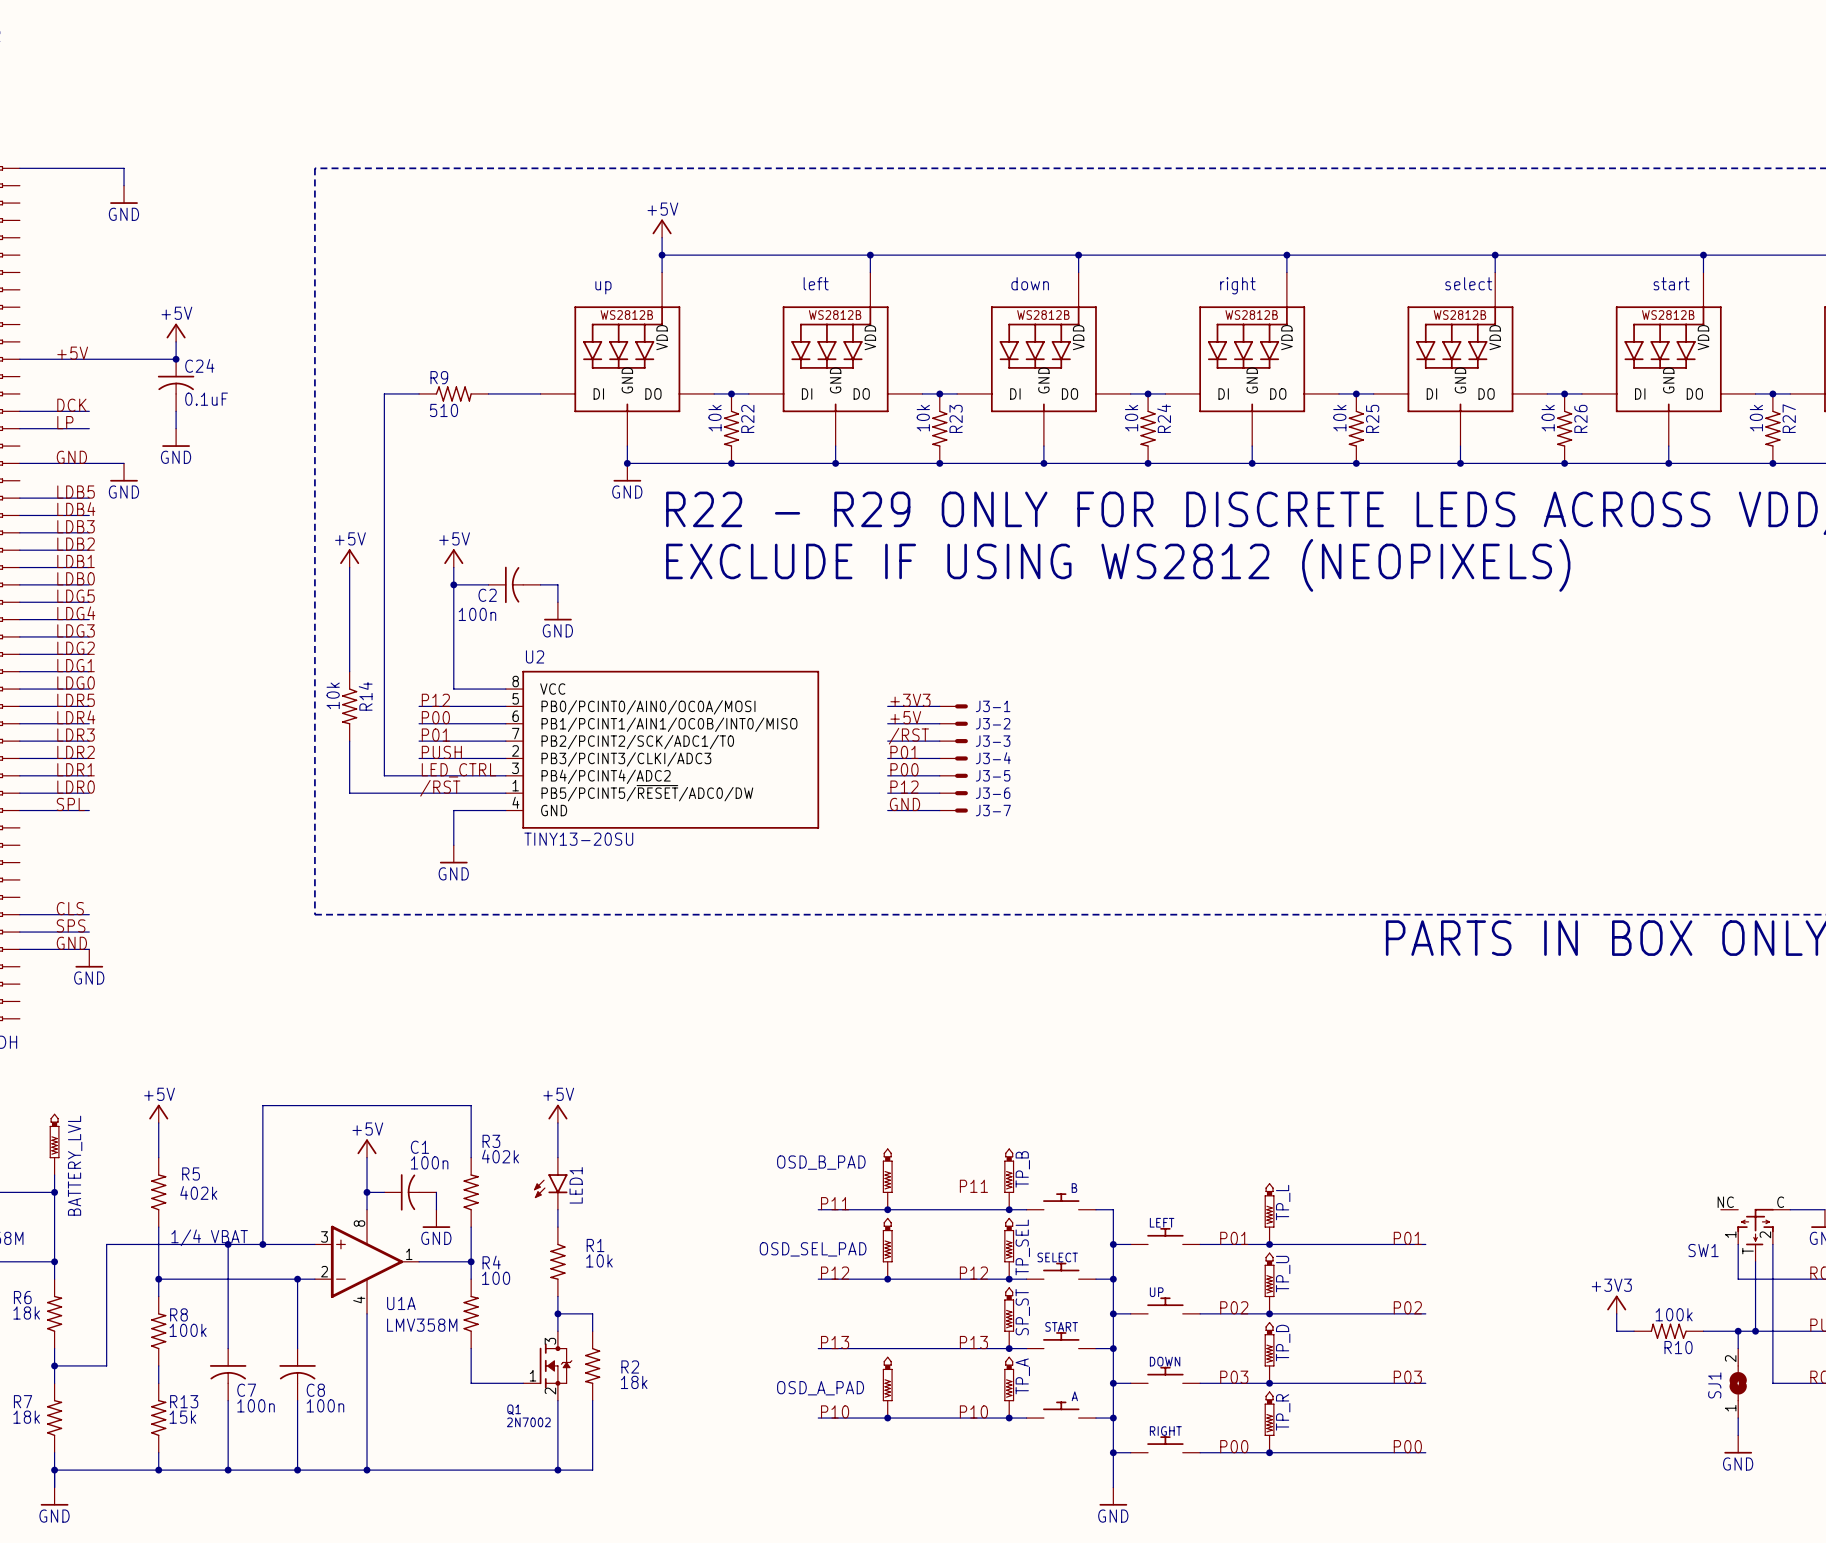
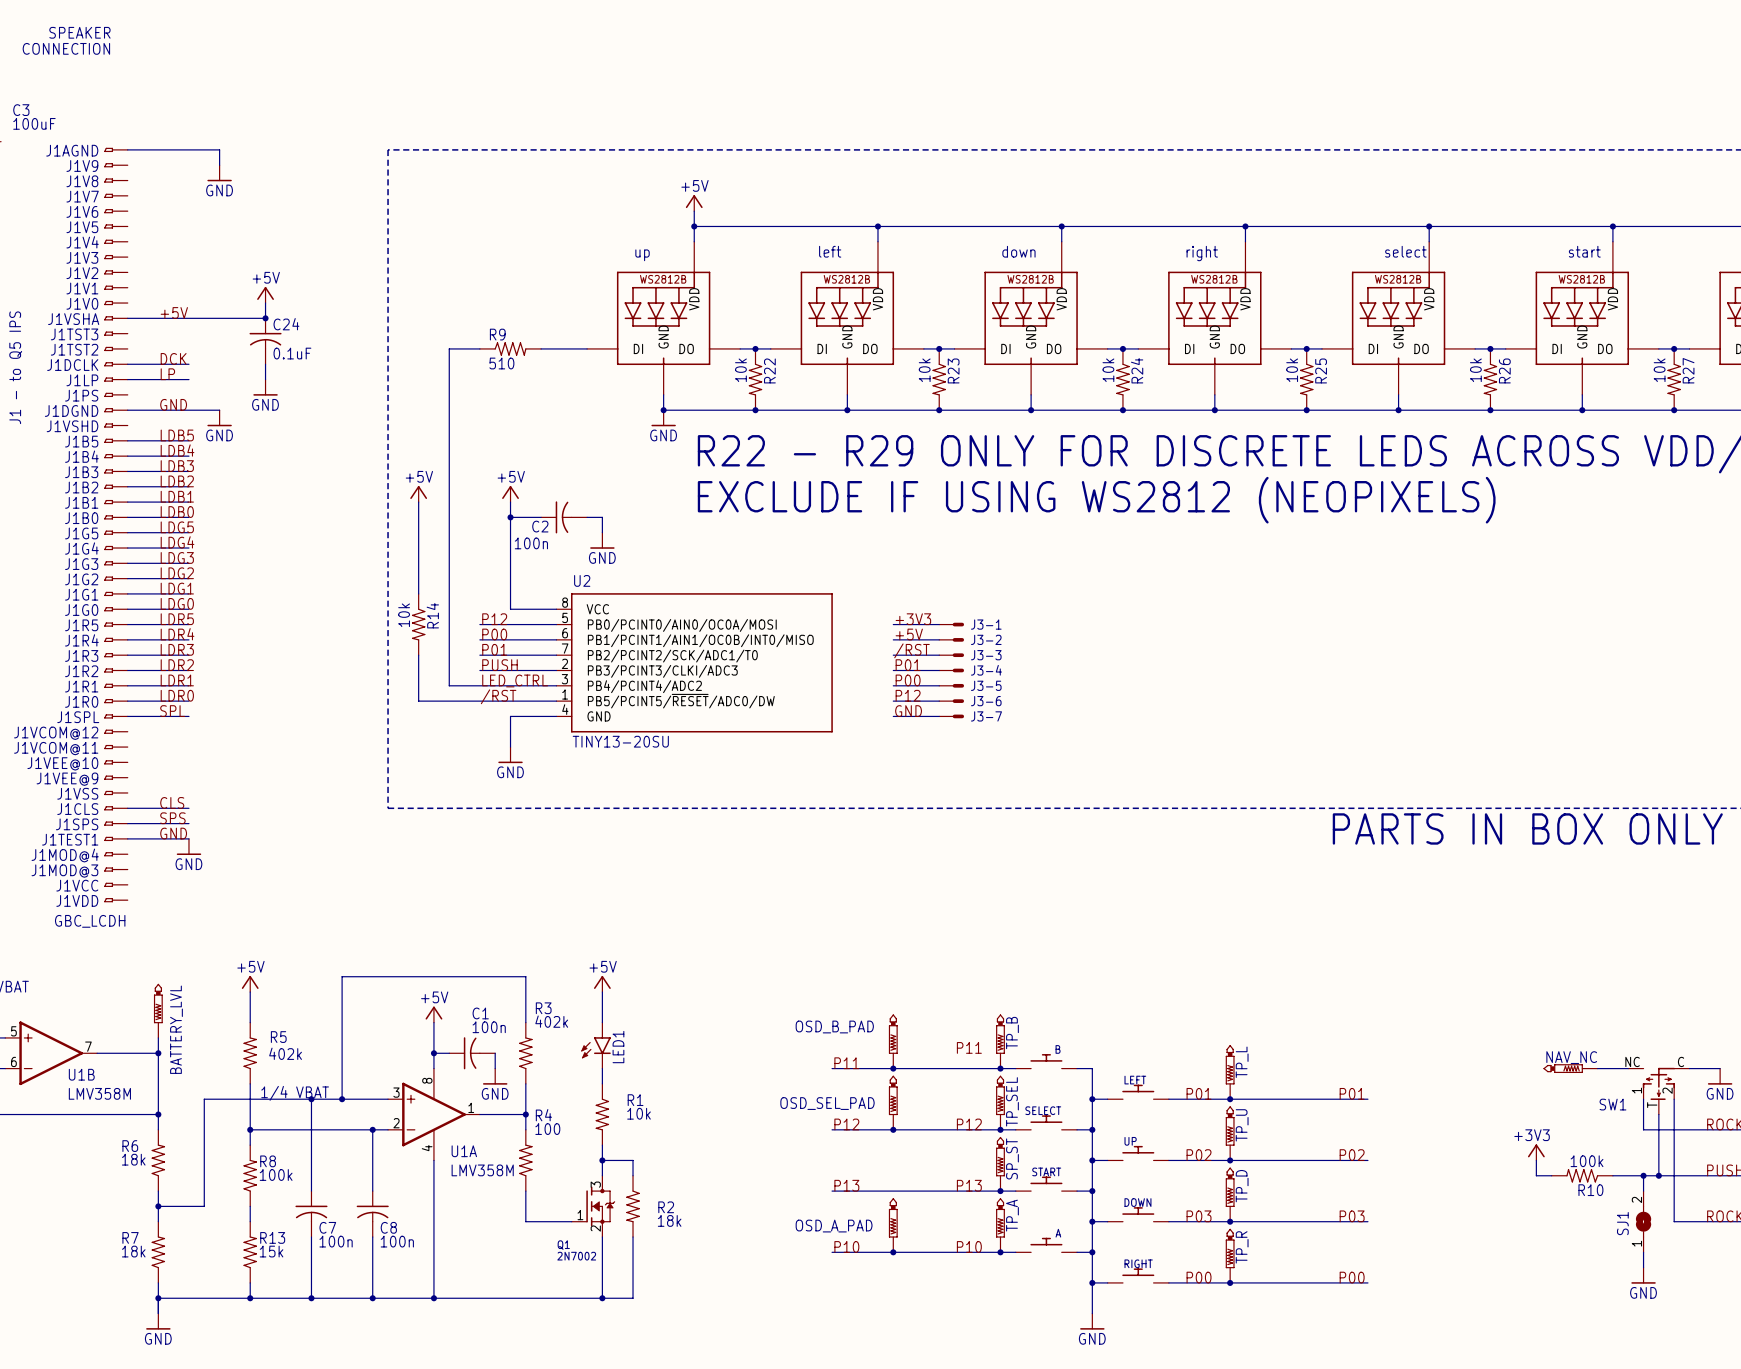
NAV_NC: none -> (1570, 1068)
wire: none -> (1597, 1068) (1628, 1068)

